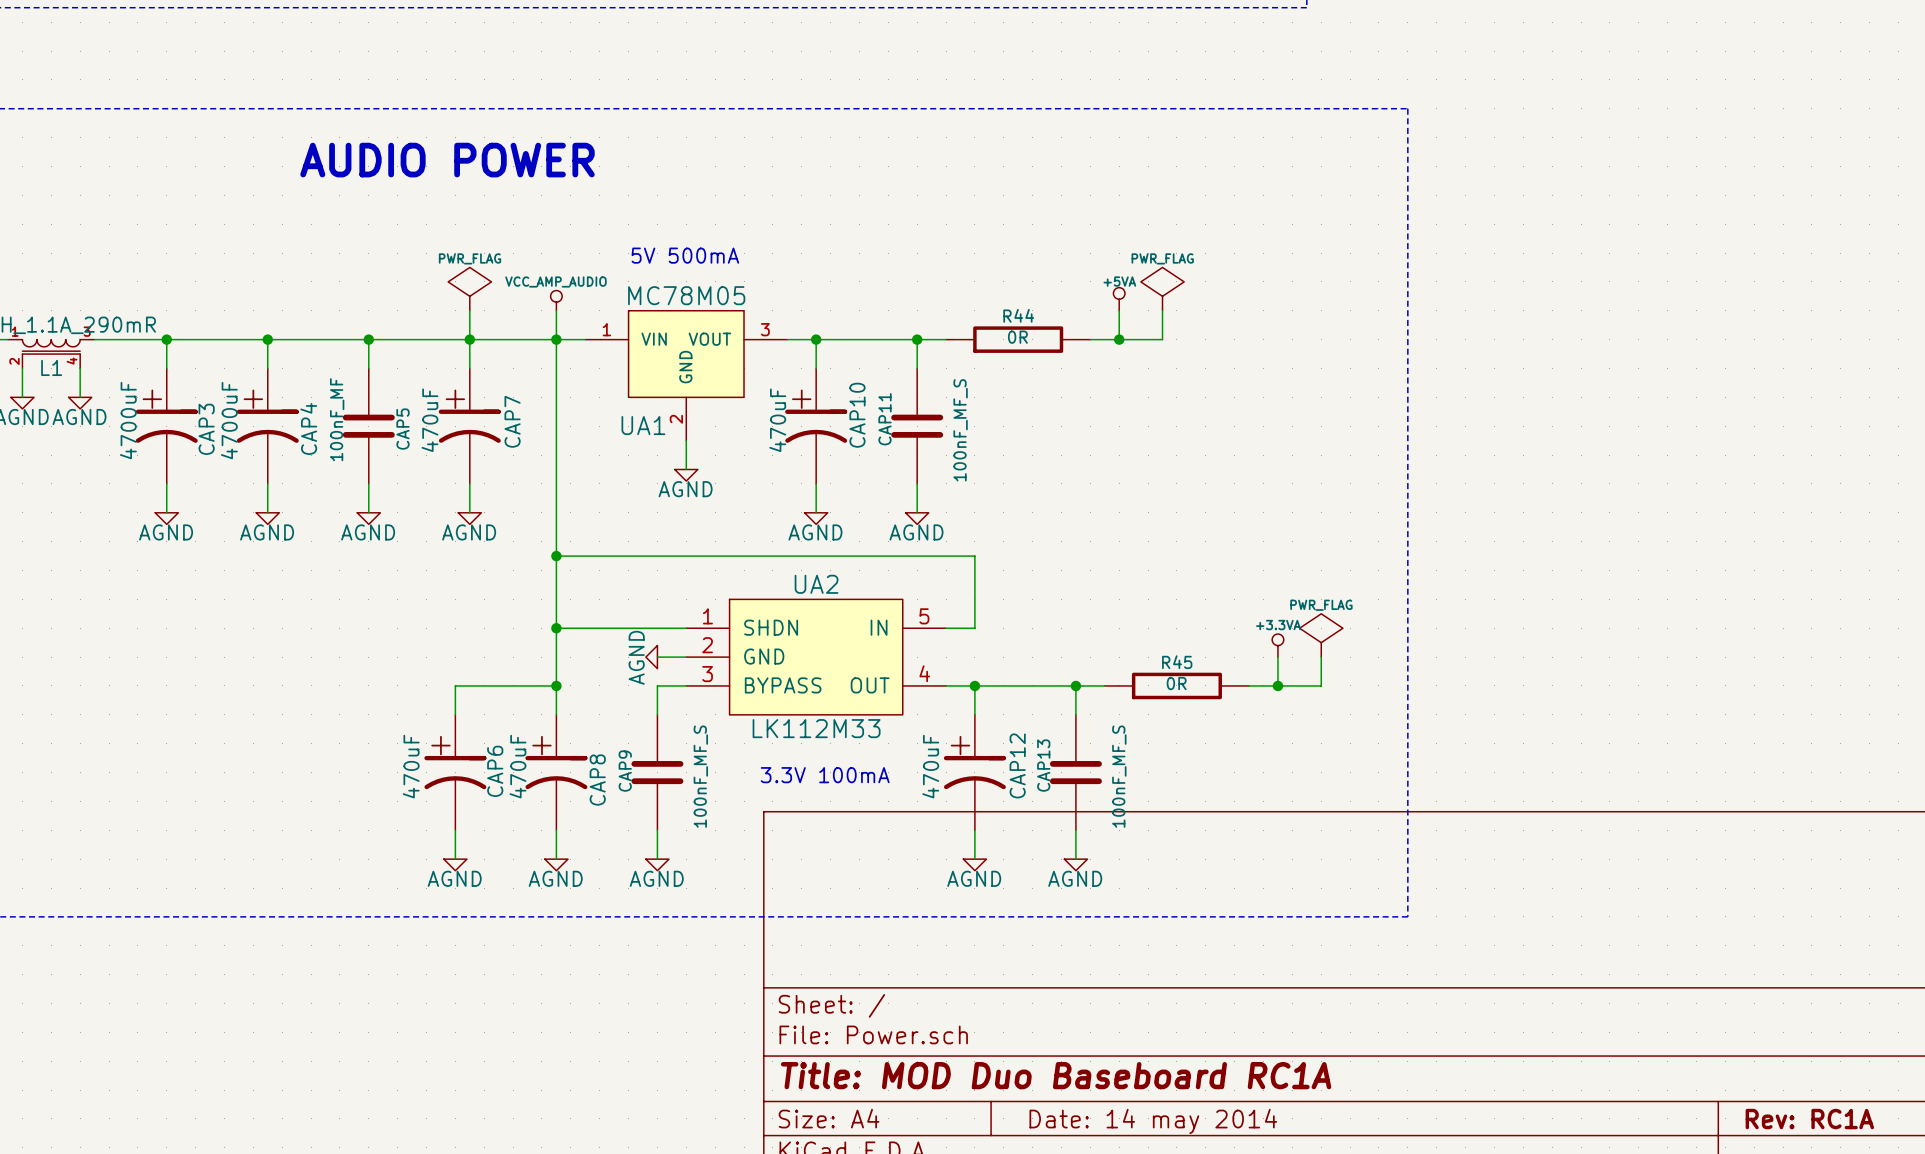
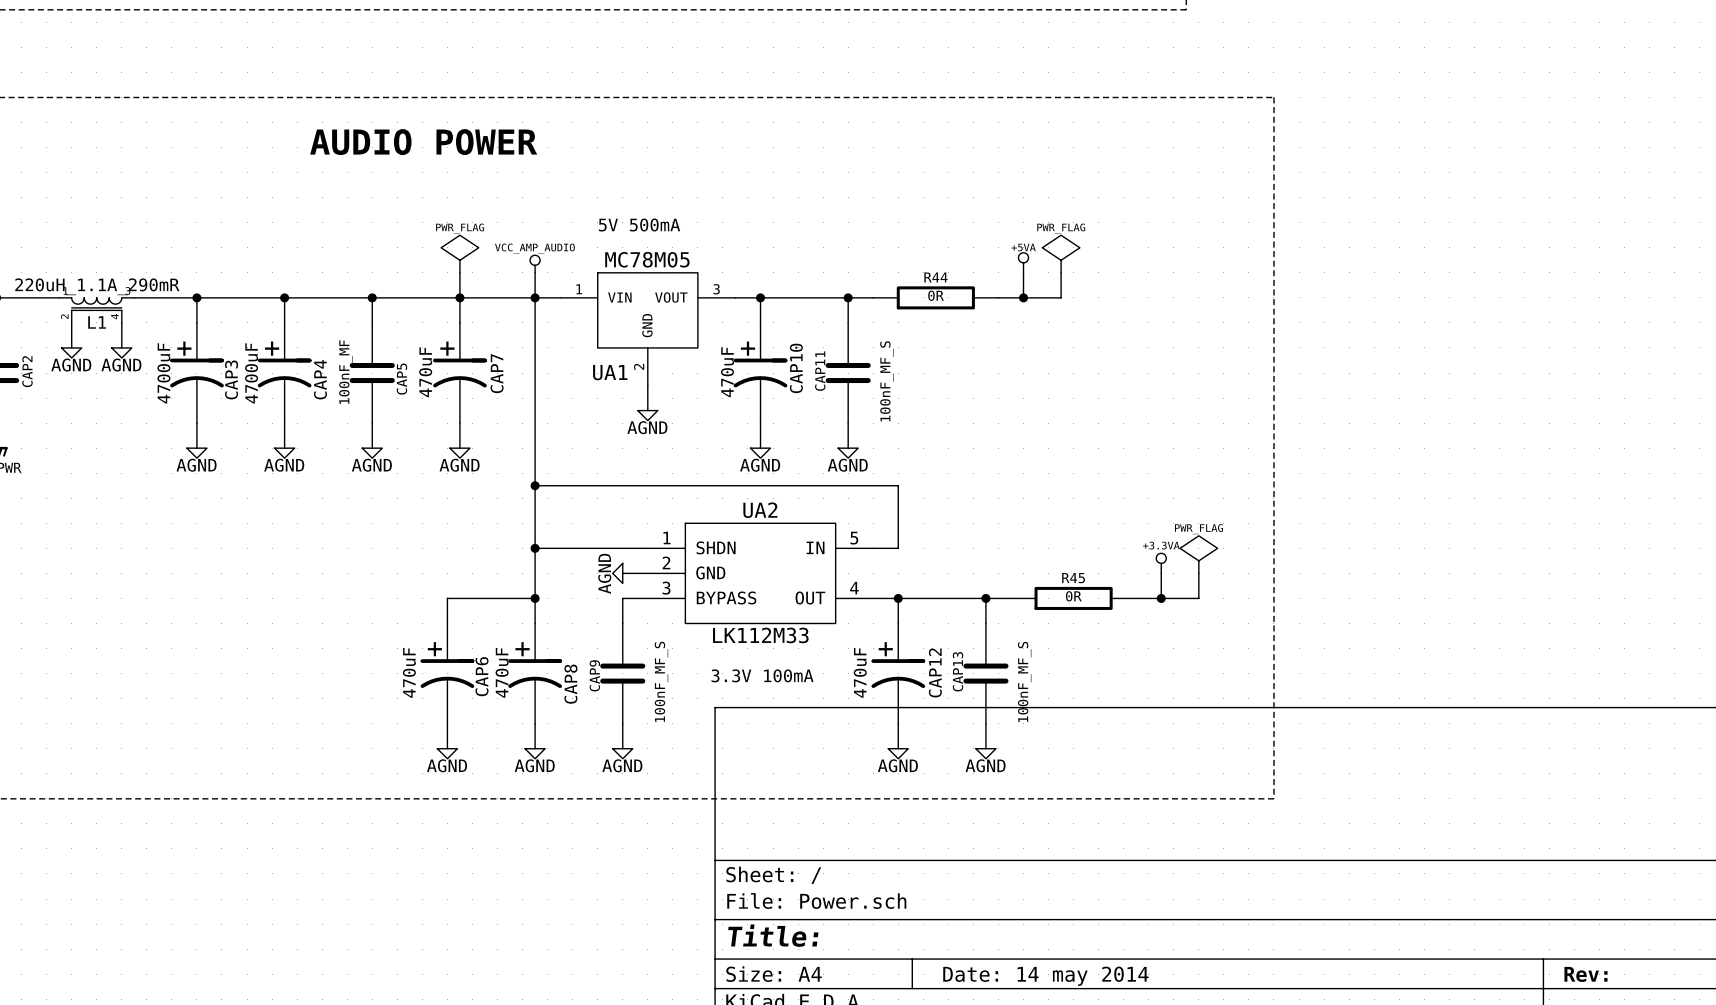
title block: Title: MOD Duo Baseboard RC1A (1056, 1075) -> Title: (773, 935)
title block: Rev: RC1A (1809, 1119) -> Rev: (1586, 974)

